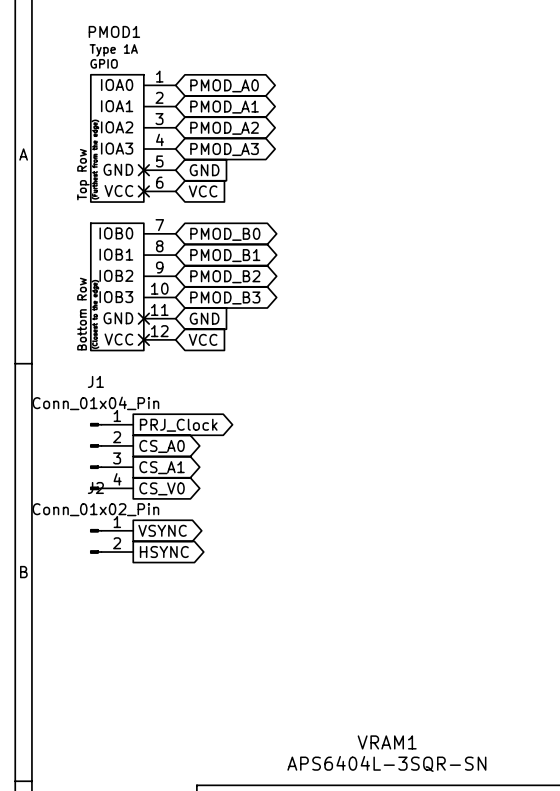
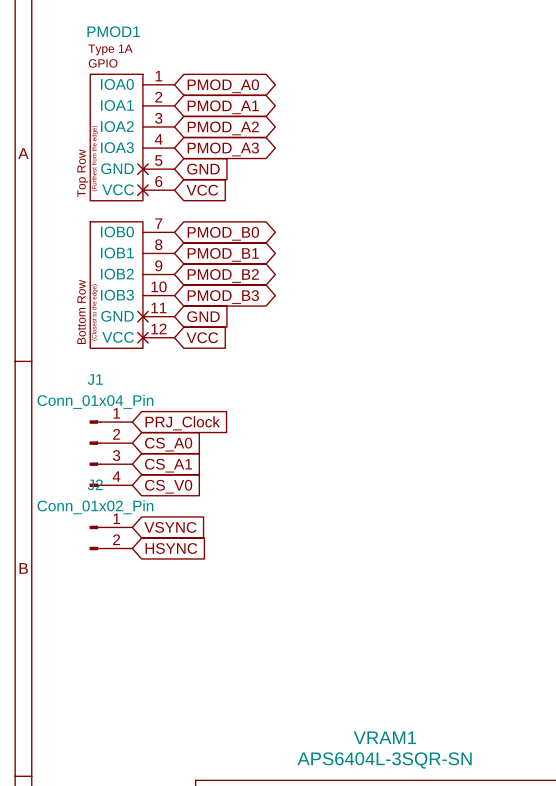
global label shape: output (178, 425) -> input (182, 423)
global label shape: output (162, 446) -> input (168, 444)
global label shape: output (162, 467) -> input (168, 465)
global label shape: output (162, 488) -> input (168, 486)
global label shape: output (162, 530) -> input (170, 527)
global label shape: output (164, 552) -> input (171, 548)

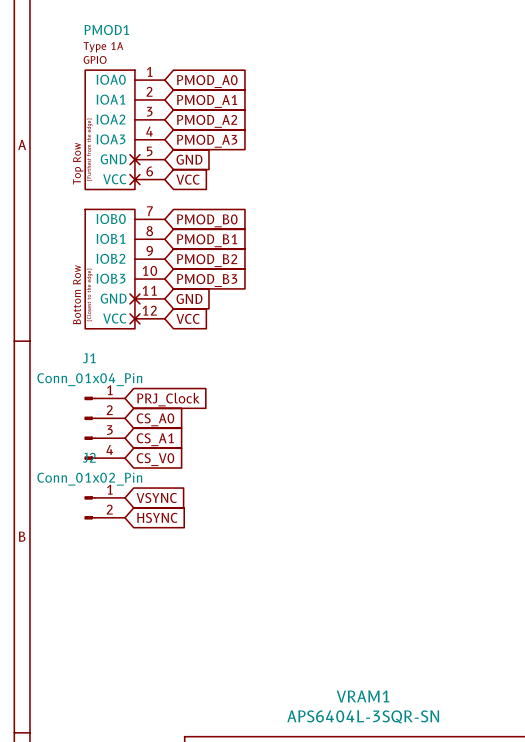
global label shape: bidirectional (223, 86) -> input (207, 81)
global label shape: bidirectional (223, 107) -> input (207, 101)
global label shape: bidirectional (223, 128) -> input (207, 121)
global label shape: bidirectional (223, 149) -> input (207, 141)
global label shape: bidirectional (223, 233) -> input (207, 220)
global label shape: bidirectional (223, 254) -> input (207, 240)
global label shape: bidirectional (223, 275) -> input (207, 260)
global label shape: bidirectional (223, 297) -> input (207, 280)

